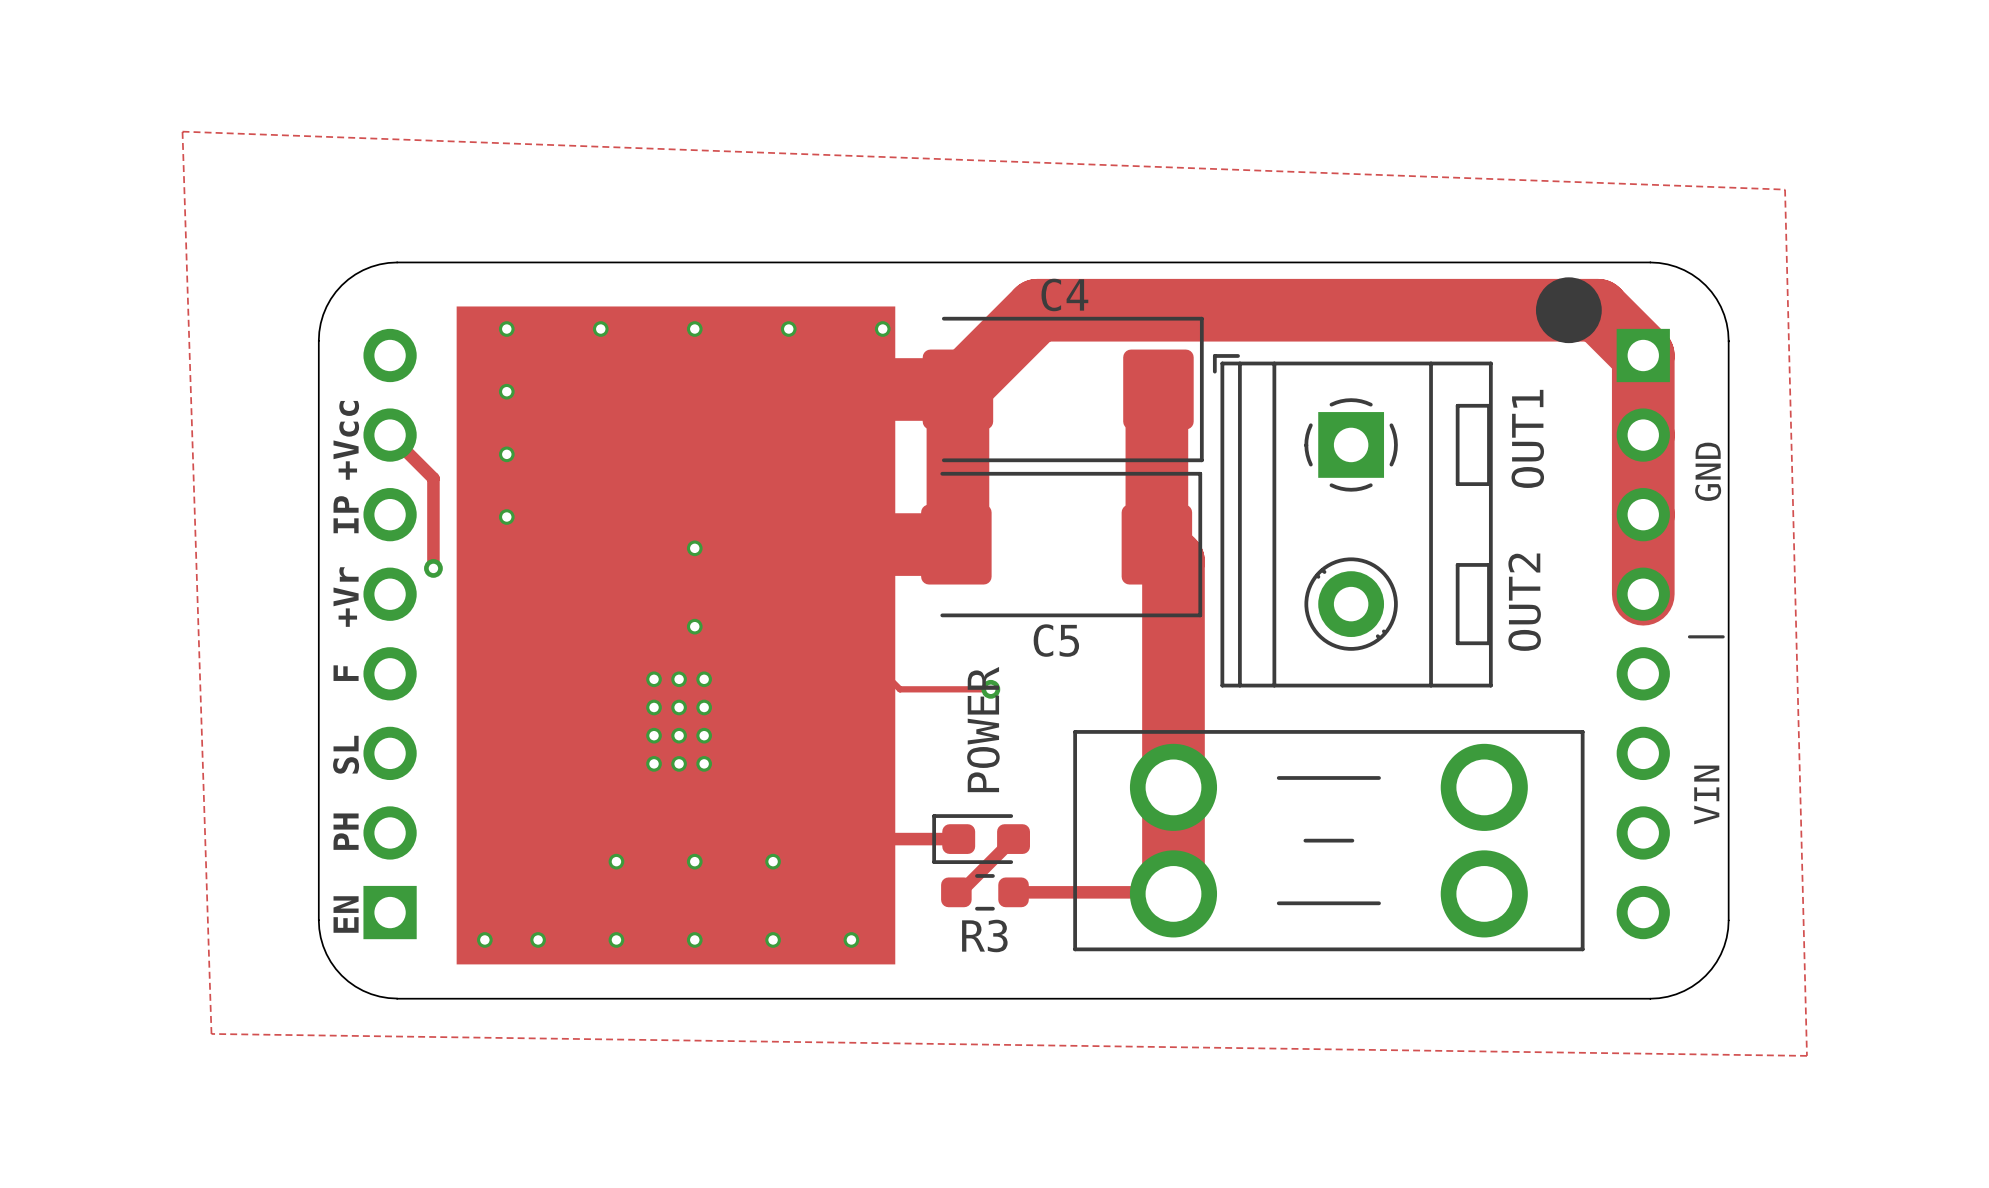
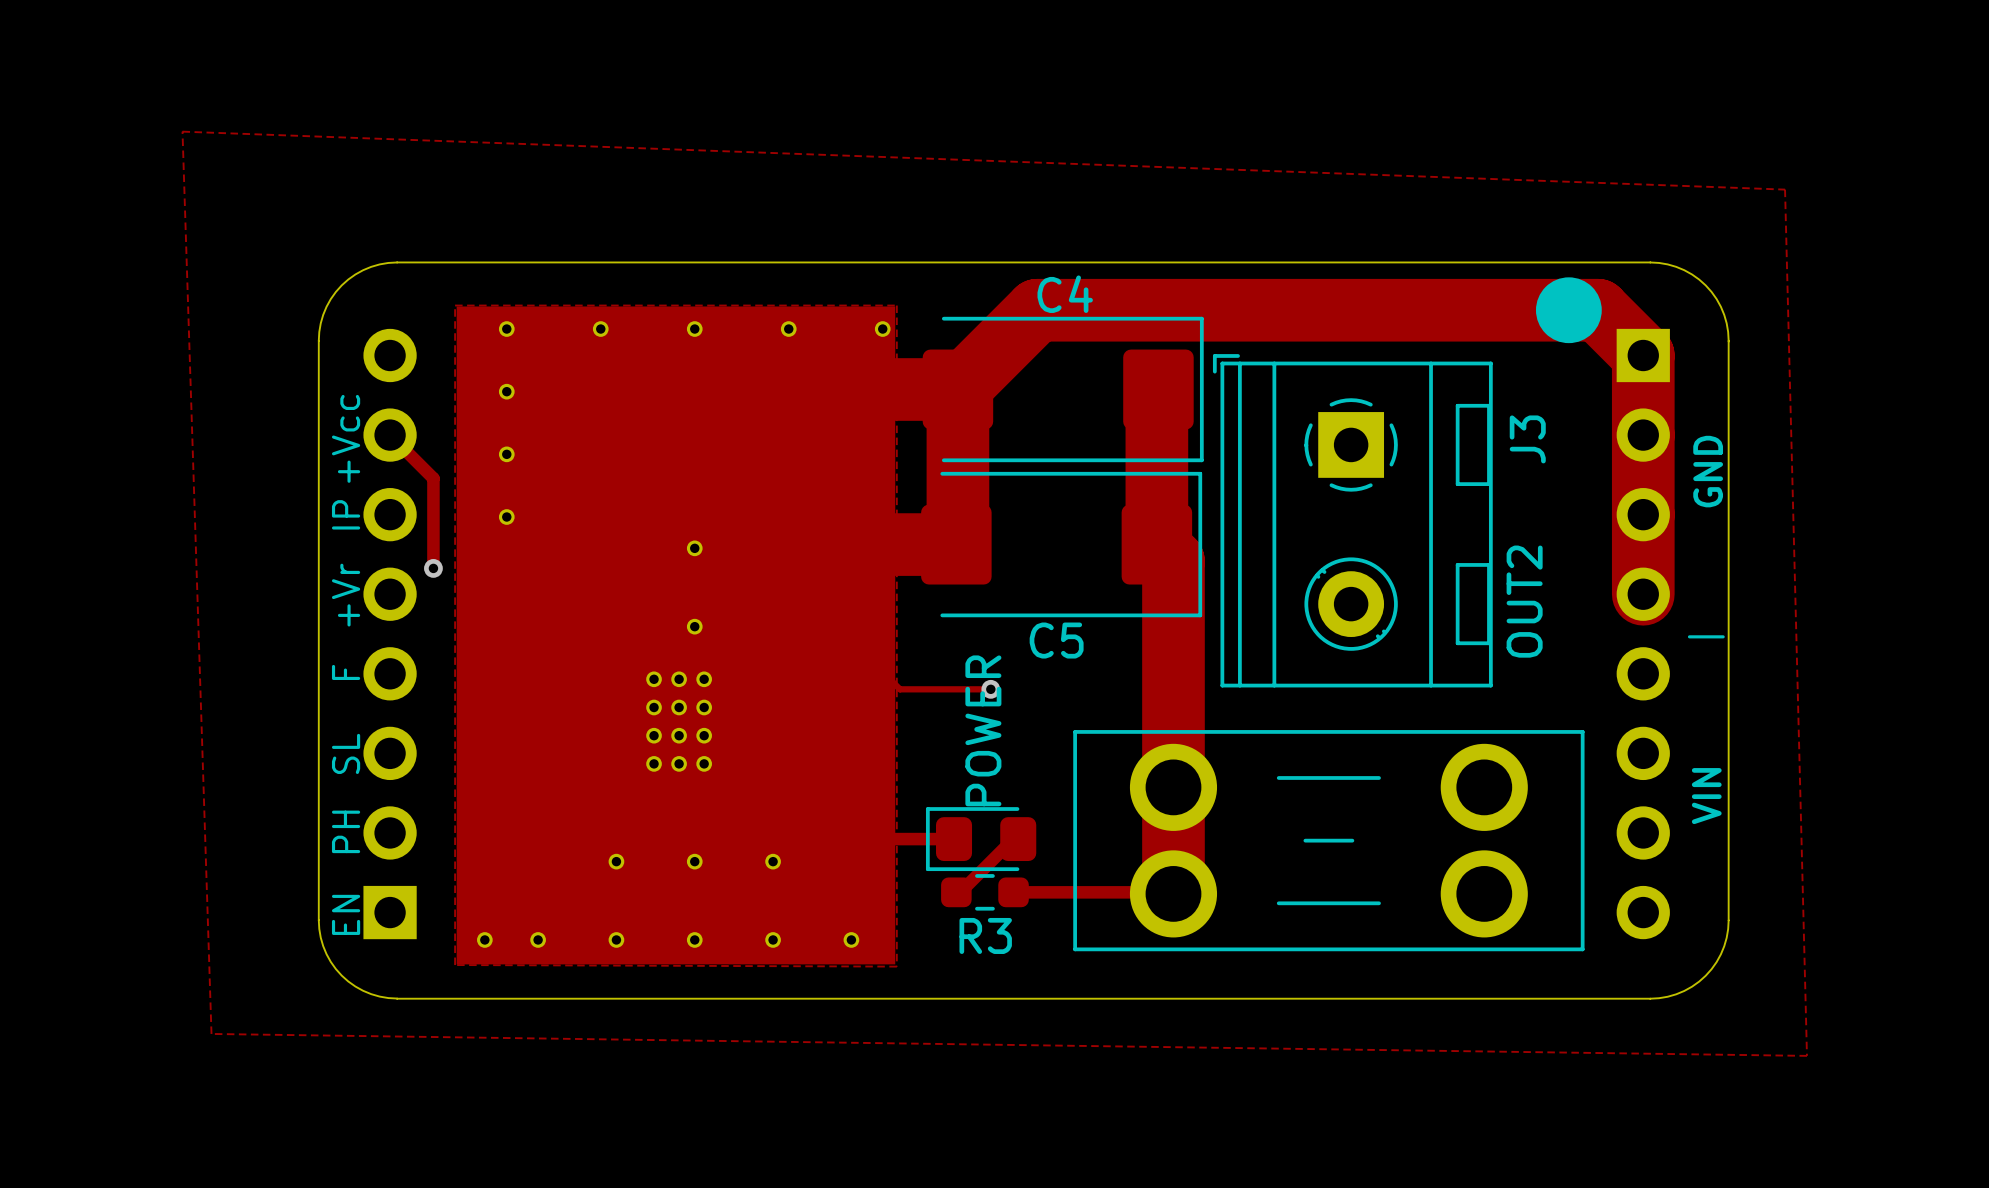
zone outline: none -> (455, 305) (896, 305) (896, 966) (455, 965) (455, 305)
OUT1 name: OUT1 (1527, 438) -> J3 (1527, 439)
part footprint: [932, 814, 1030, 864] -> [925, 807, 1037, 872]

